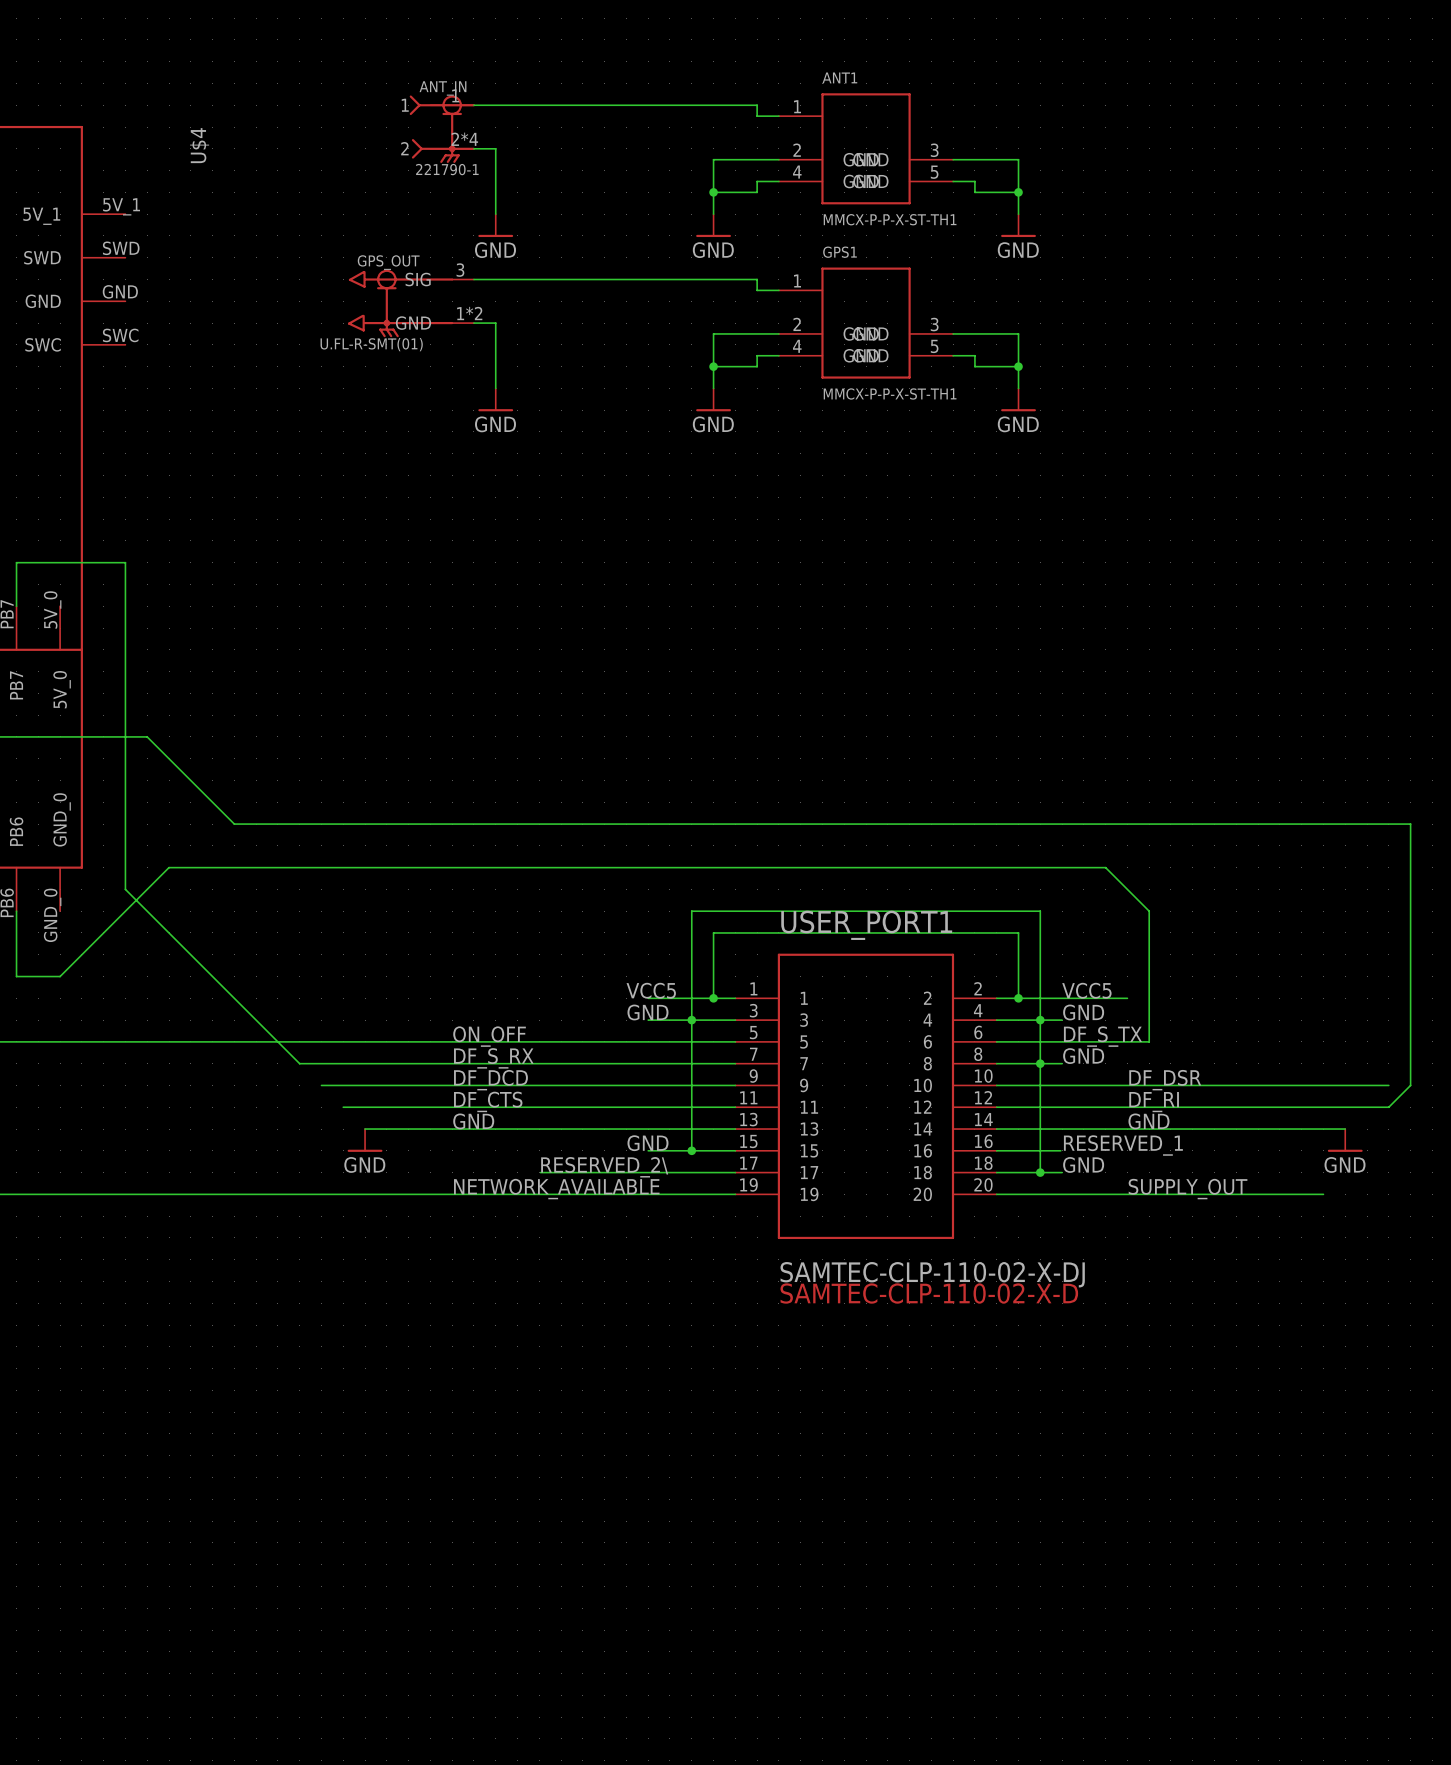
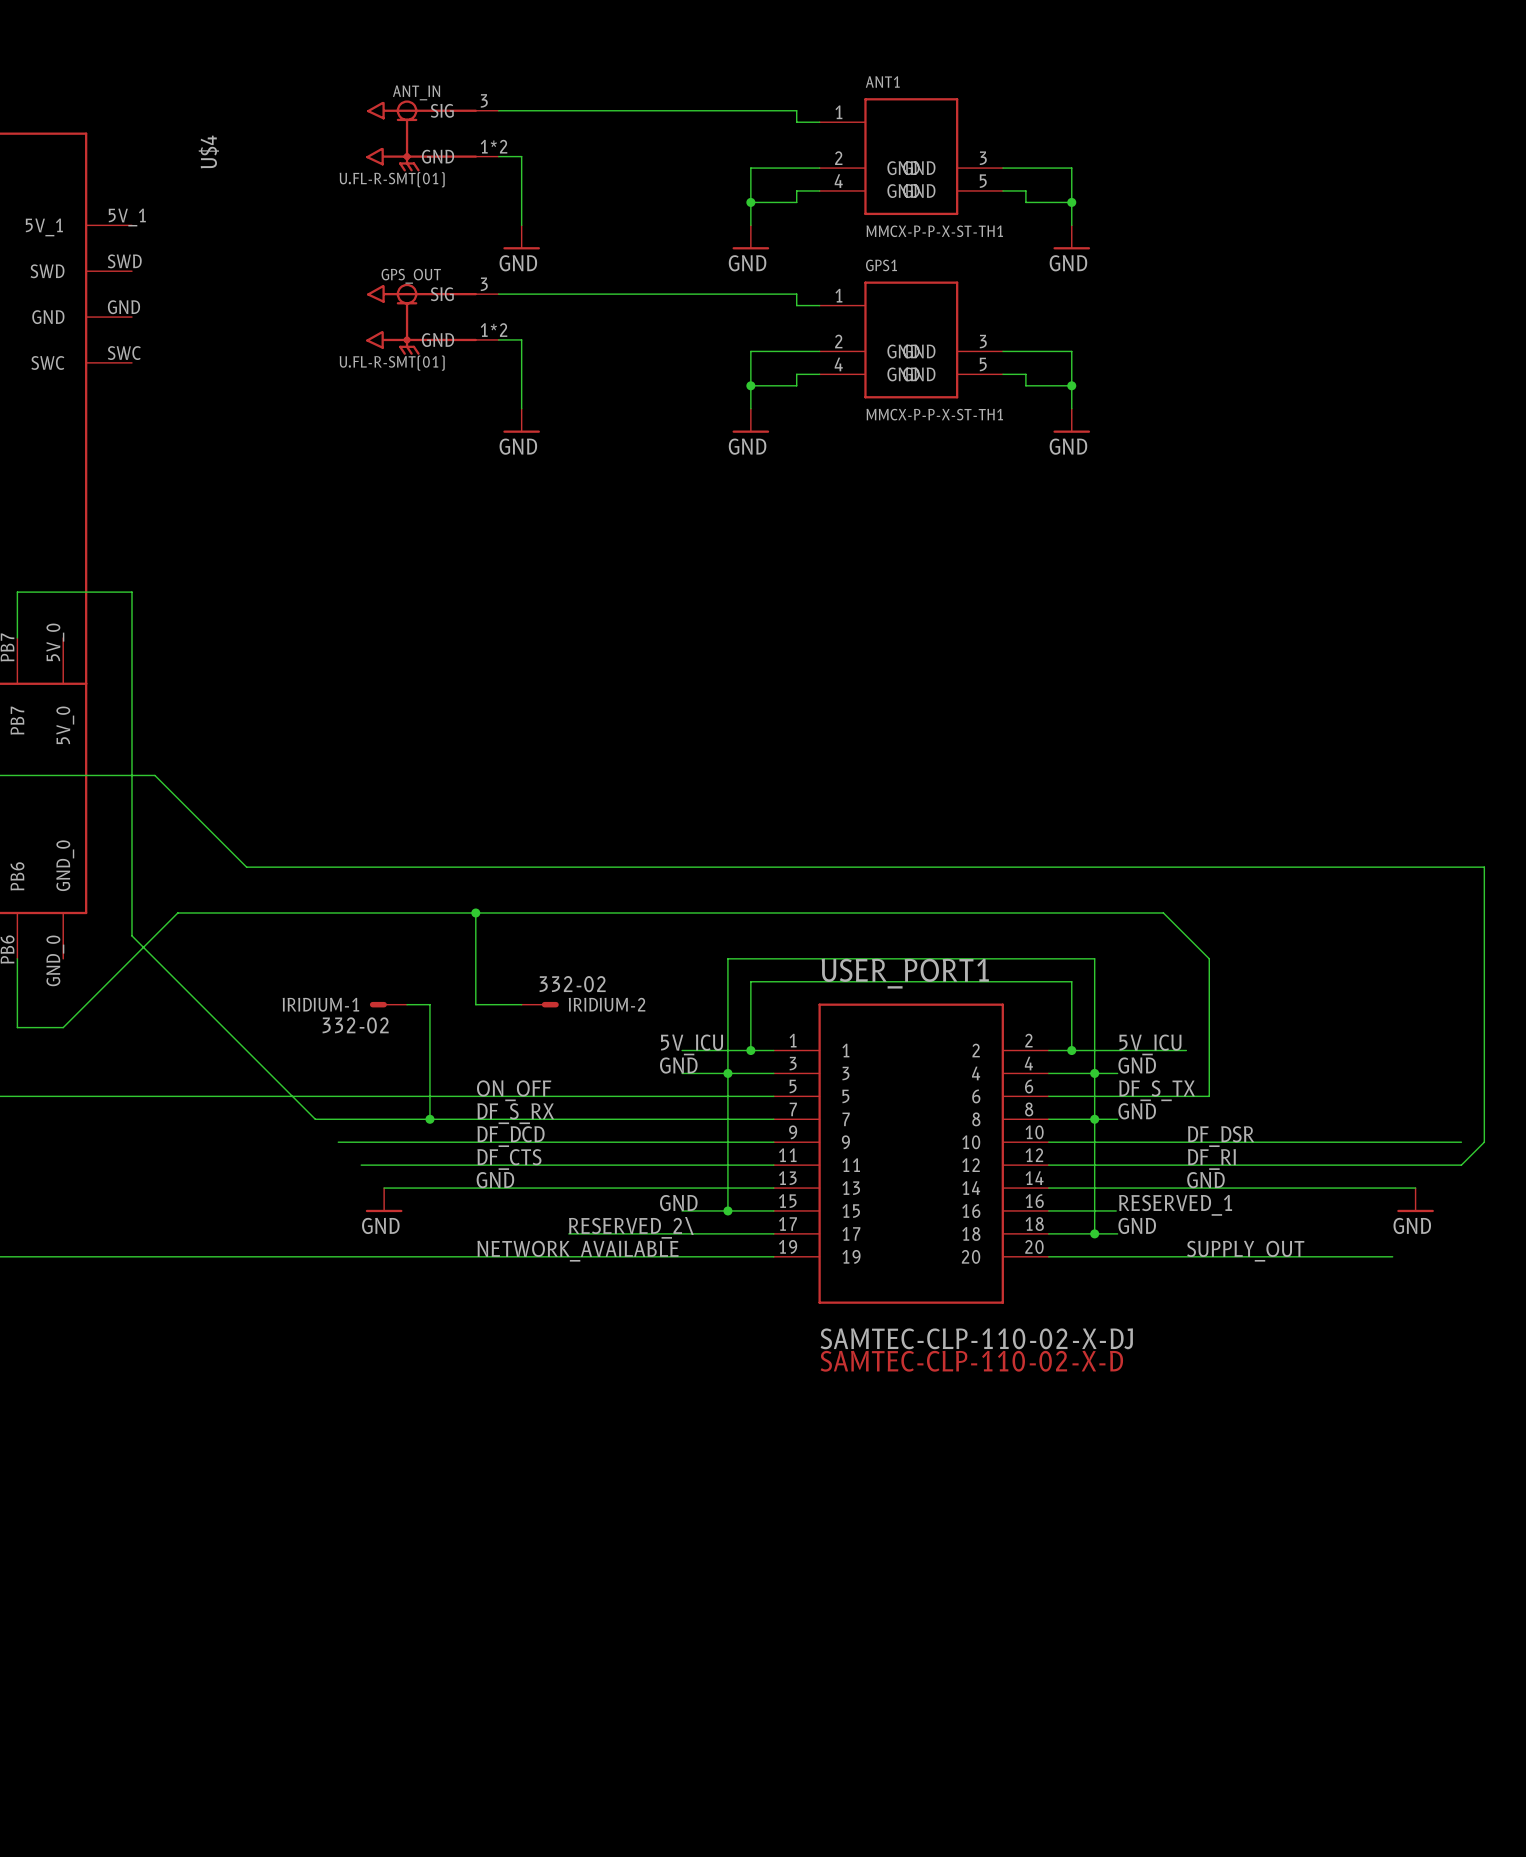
ANT_IN: none -> U.FL-R-SMT(01) (432, 135)
ANT_IN: 221790-1 (442, 129) -> none
wire: none -> (475, 912) (475, 1004) (521, 1004)
junction: none -> (475, 912)
IRIDIUM-1: none -> 332-02 (388, 1004)
wire: none -> (407, 1004) (429, 1004) (429, 1119)
IRIDIUM-2: none -> 332-02 (540, 1004)
label: VCC5 (651, 990) -> 5V_ICU (692, 1044)
label: VCC5 (1086, 990) -> 5V_ICU (1150, 1044)
junction: none -> (429, 1119)

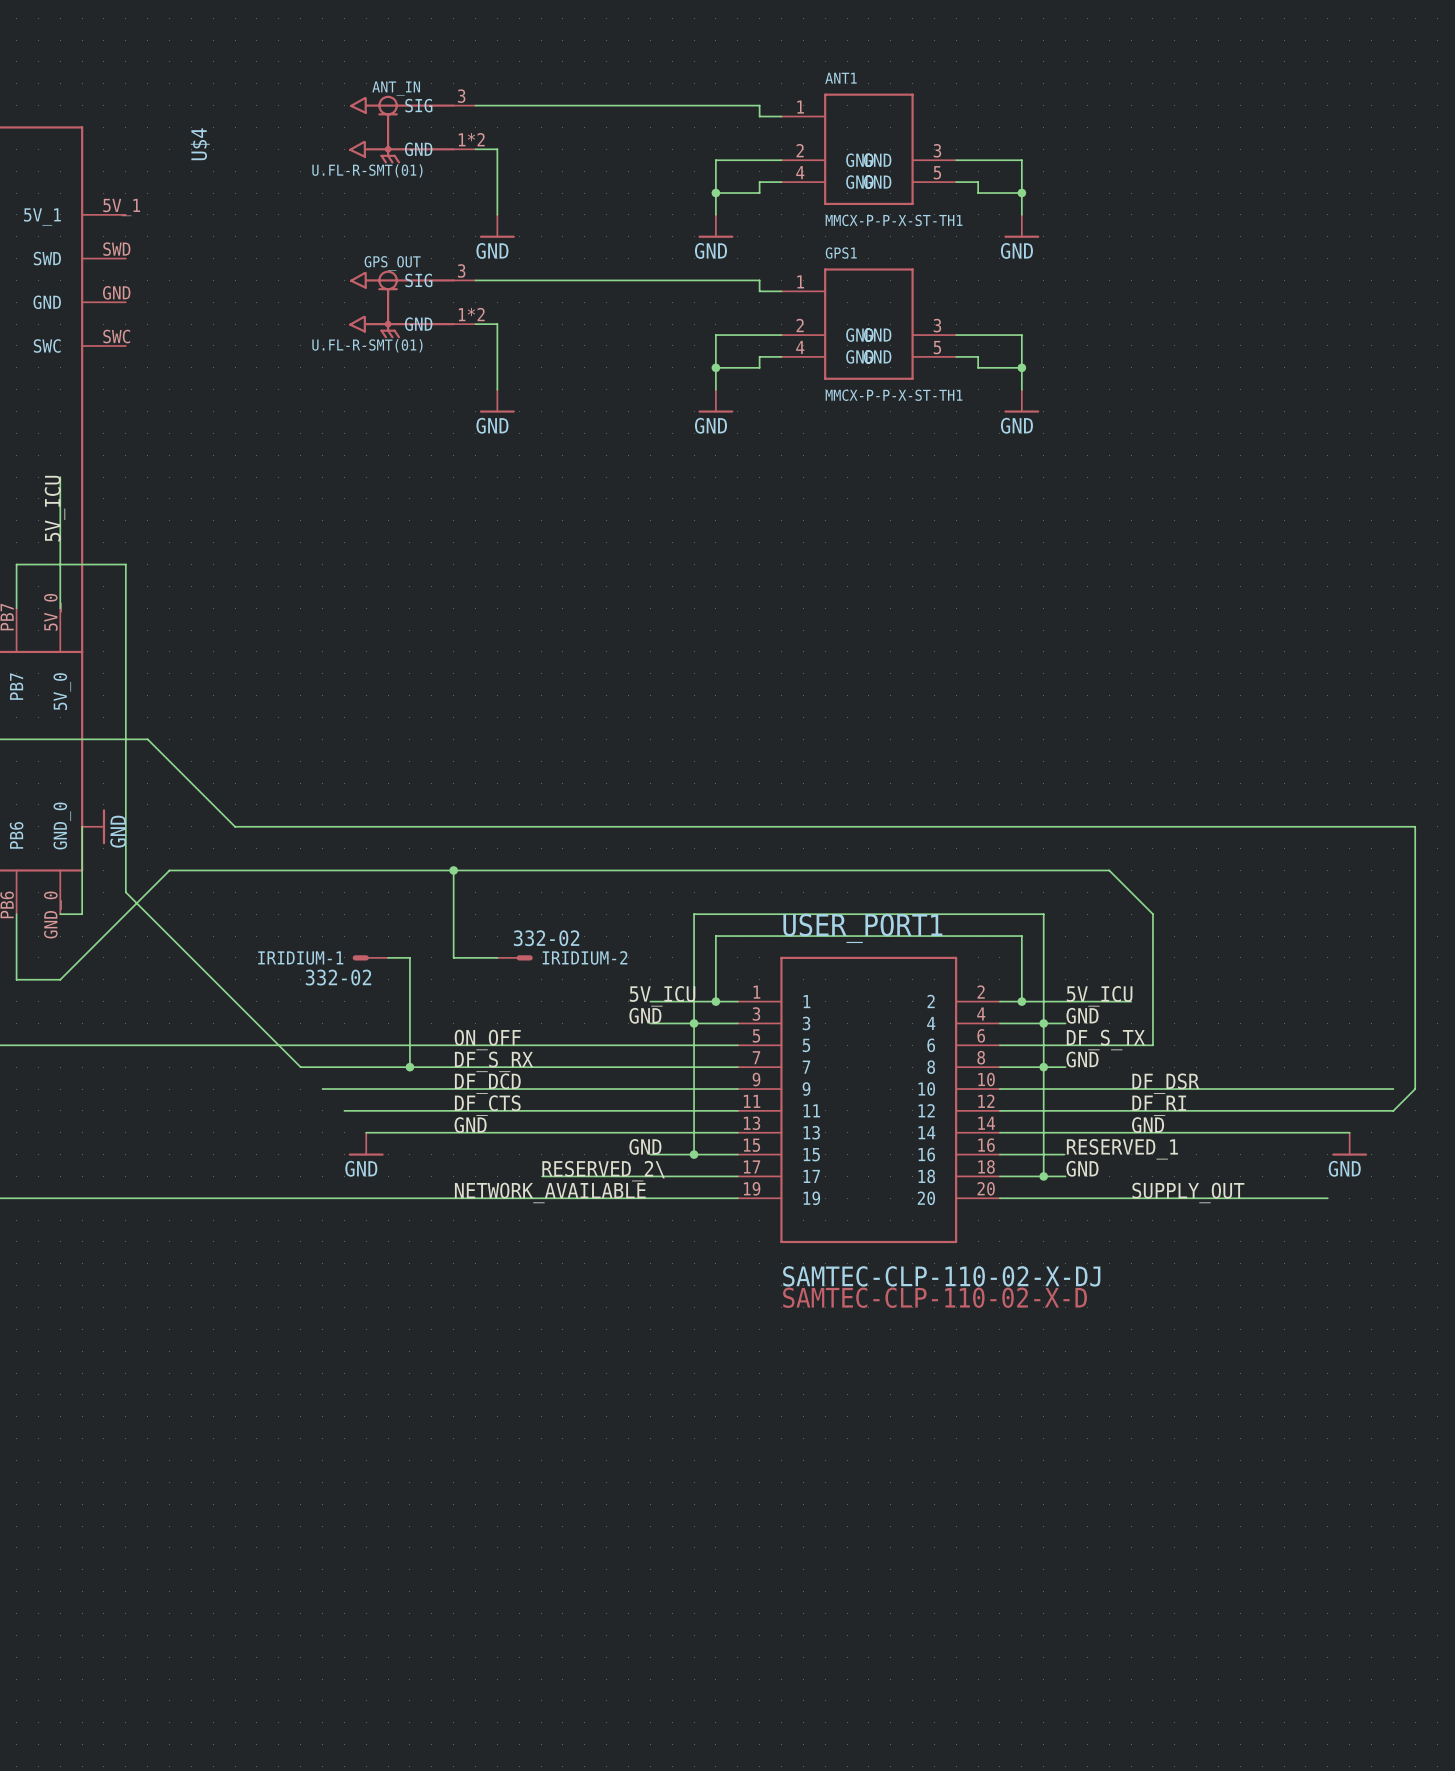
wire: none -> (60, 477) (60, 608)
label: none -> 5V_ICU (54, 508)
wire: none -> (82, 826) (82, 914) (60, 914)
power symbol: none -> GND (93, 826)

